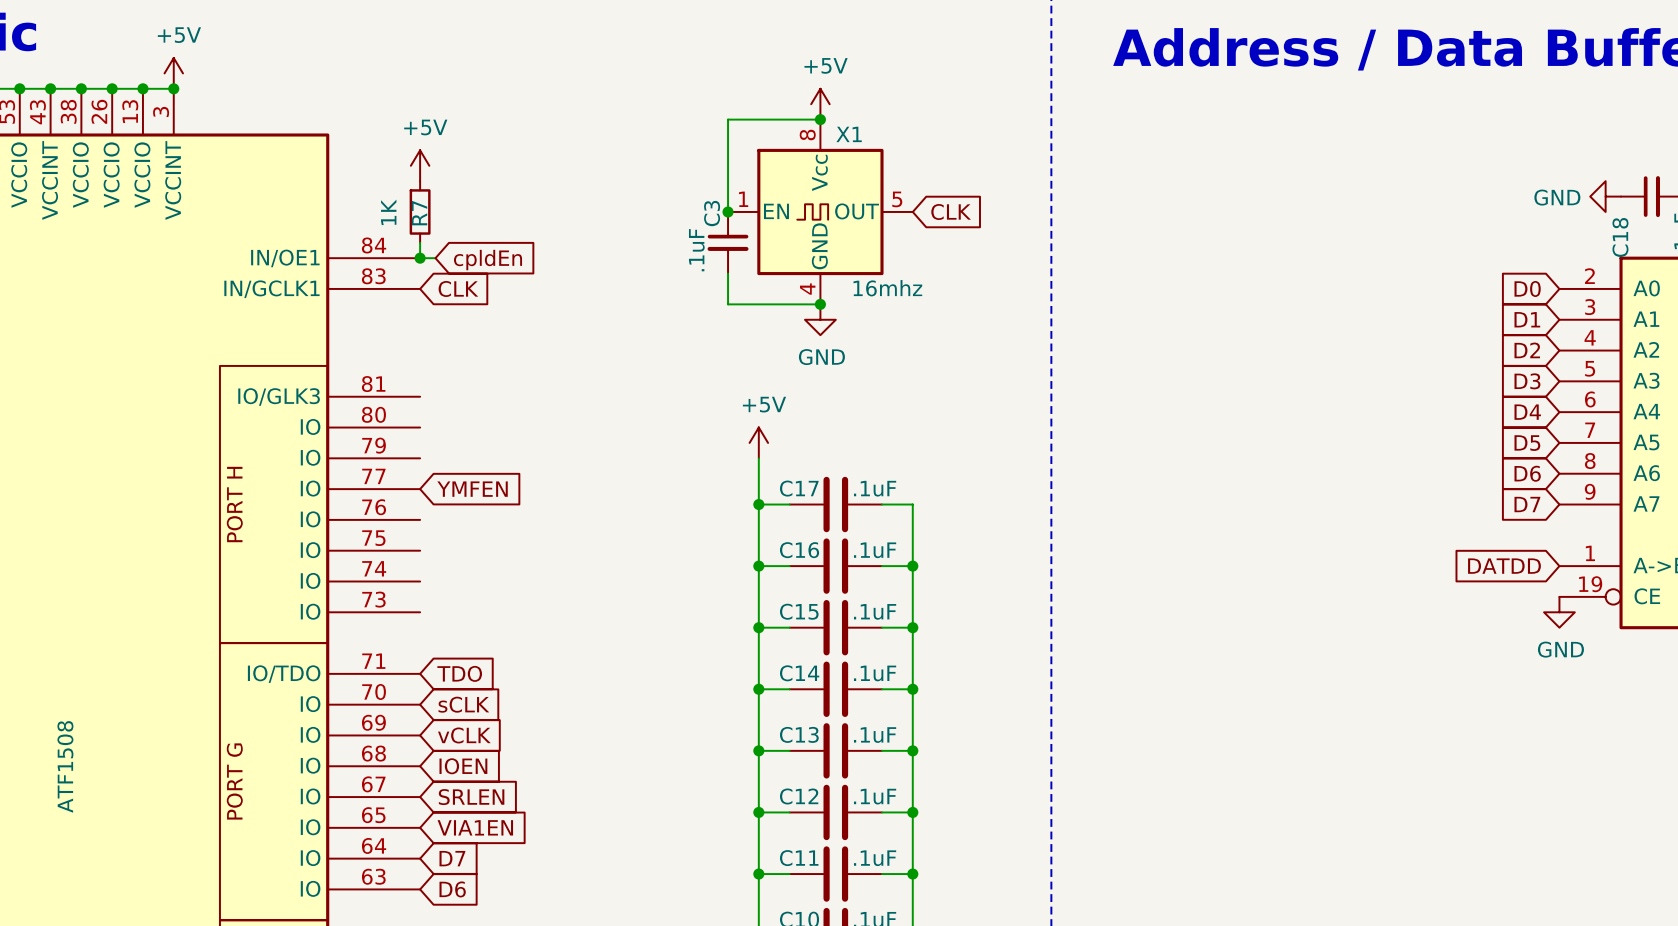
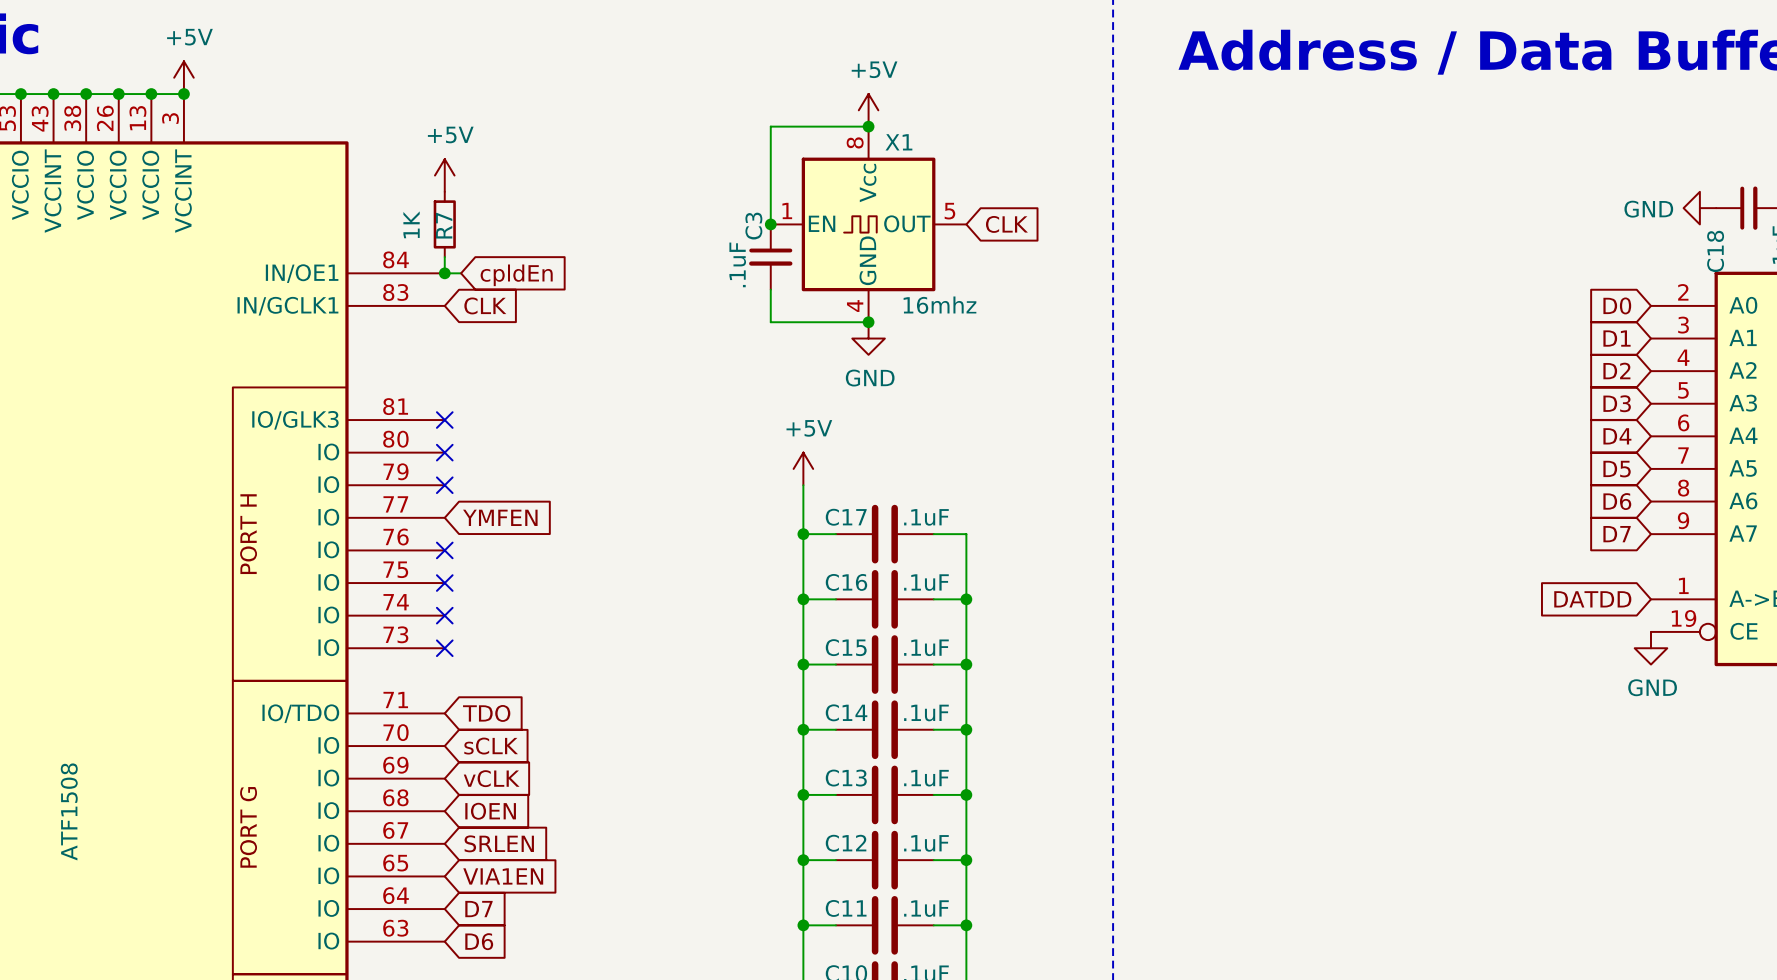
no-connect mark: none -> (444, 420)
no-connect mark: none -> (444, 452)
no-connect mark: none -> (444, 485)
no-connect mark: none -> (444, 550)
no-connect mark: none -> (444, 583)
no-connect mark: none -> (444, 615)
no-connect mark: none -> (444, 648)

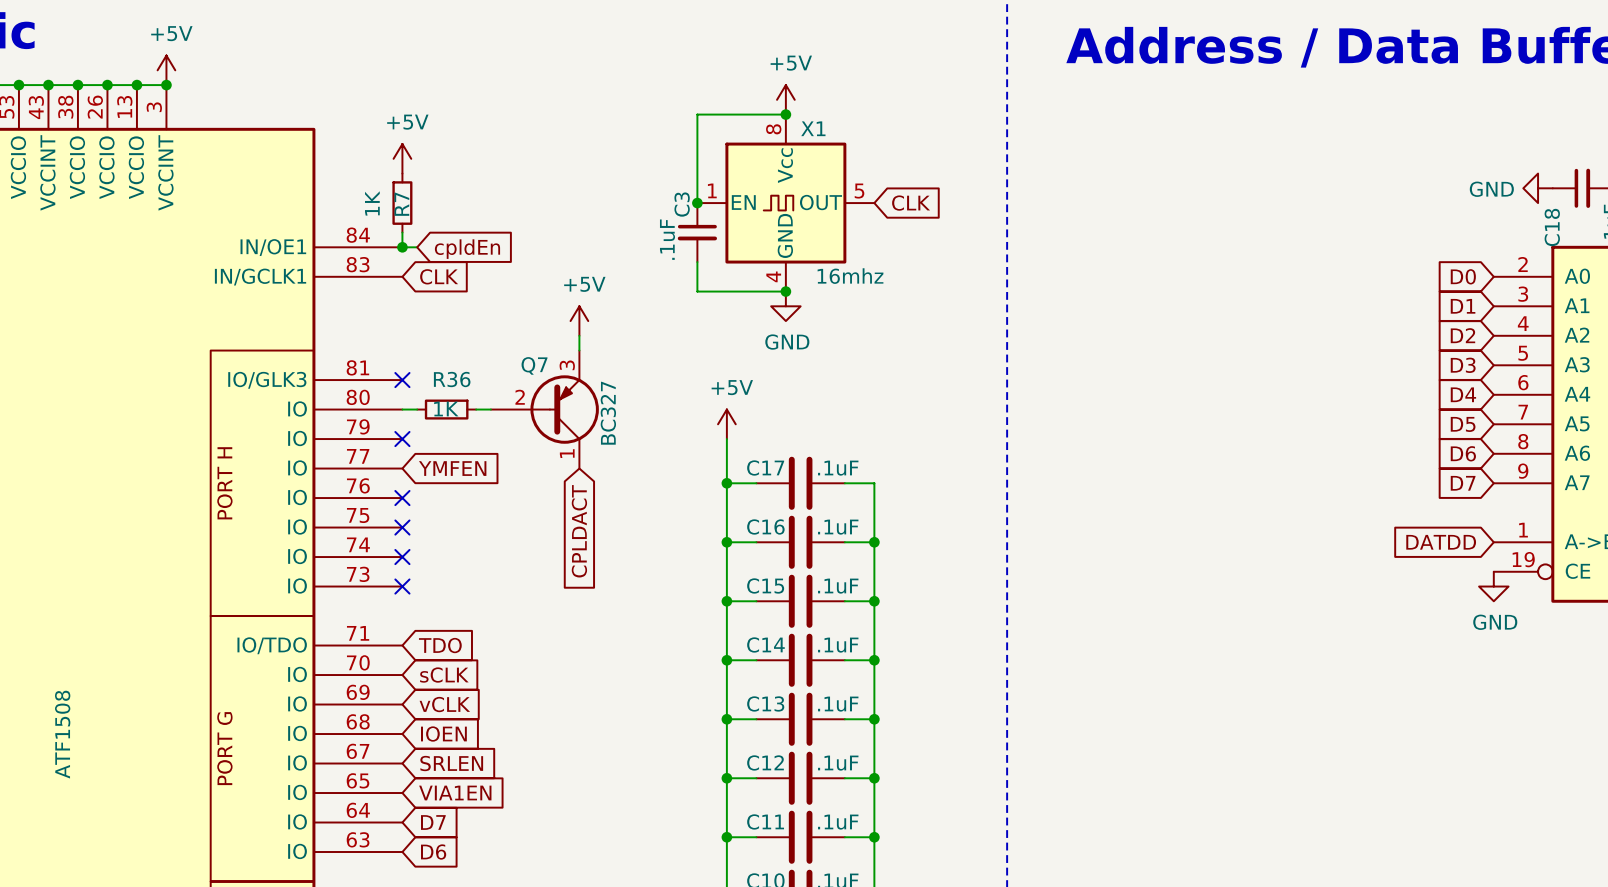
power symbol: none -> +5V (579, 321)
wire: none -> (579, 335) (579, 350)
wire: none -> (402, 409) (417, 409)
no-connect mark: (444, 452) -> none
R36: none -> 1K (446, 409)
wire: none -> (476, 409) (490, 409)
Q7: none -> BC327 (544, 409)
global label: none -> CPLDACT (579, 531)

